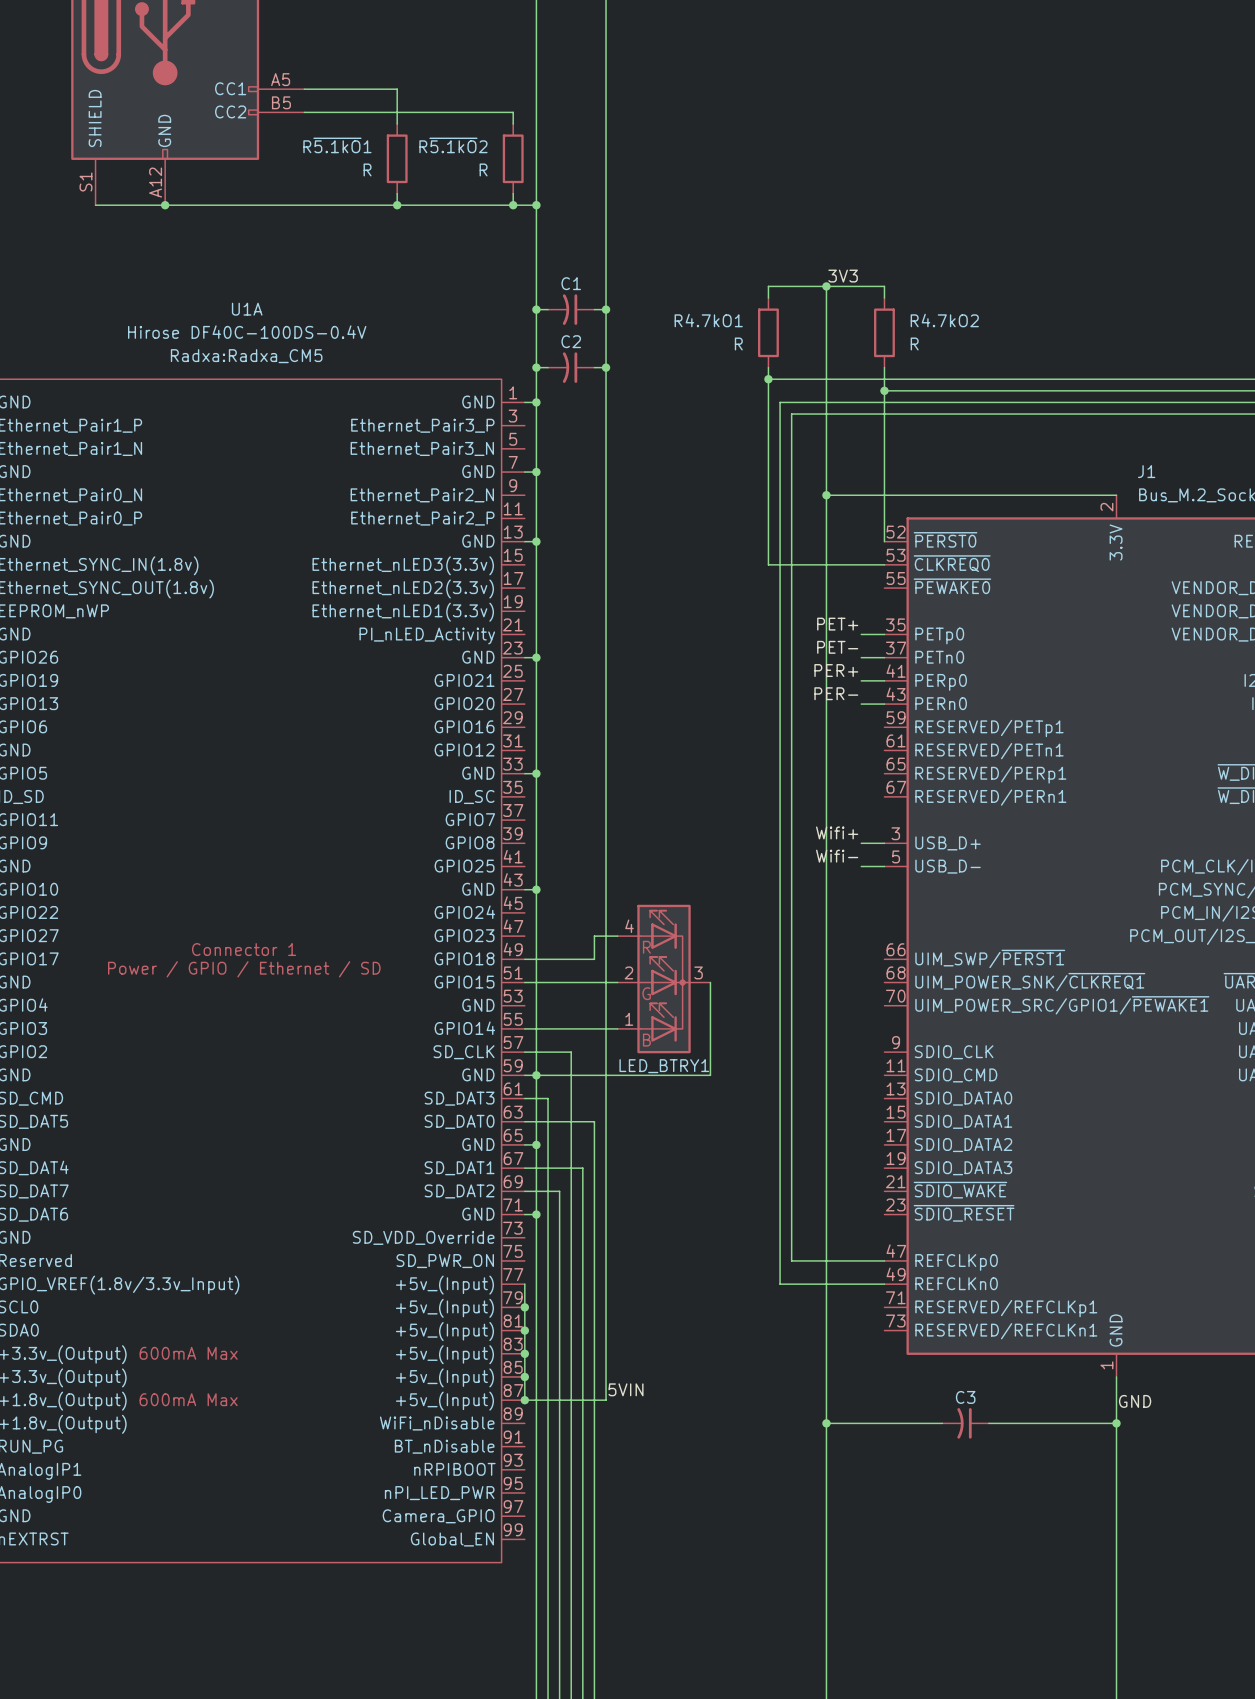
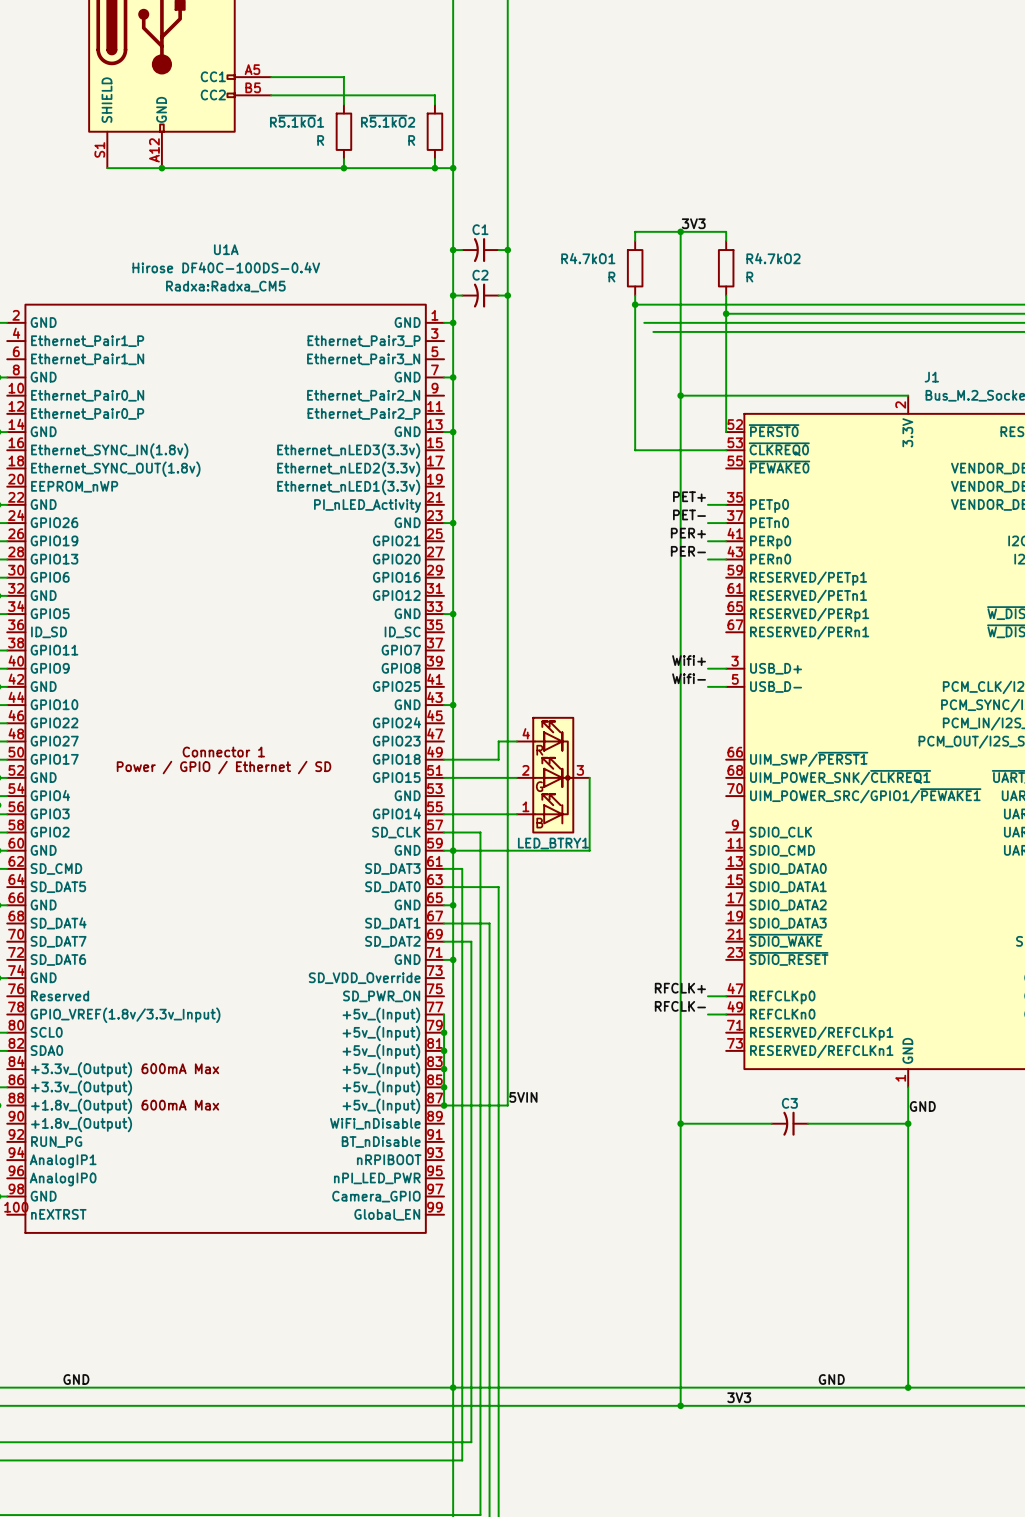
wire: (780, 402) (780, 1284) (861, 1284) -> none
wire: (791, 414) (791, 1260) (861, 1260) -> none
label: none -> RFCLK+ (680, 988)
label: none -> RFCLK- (680, 1006)

